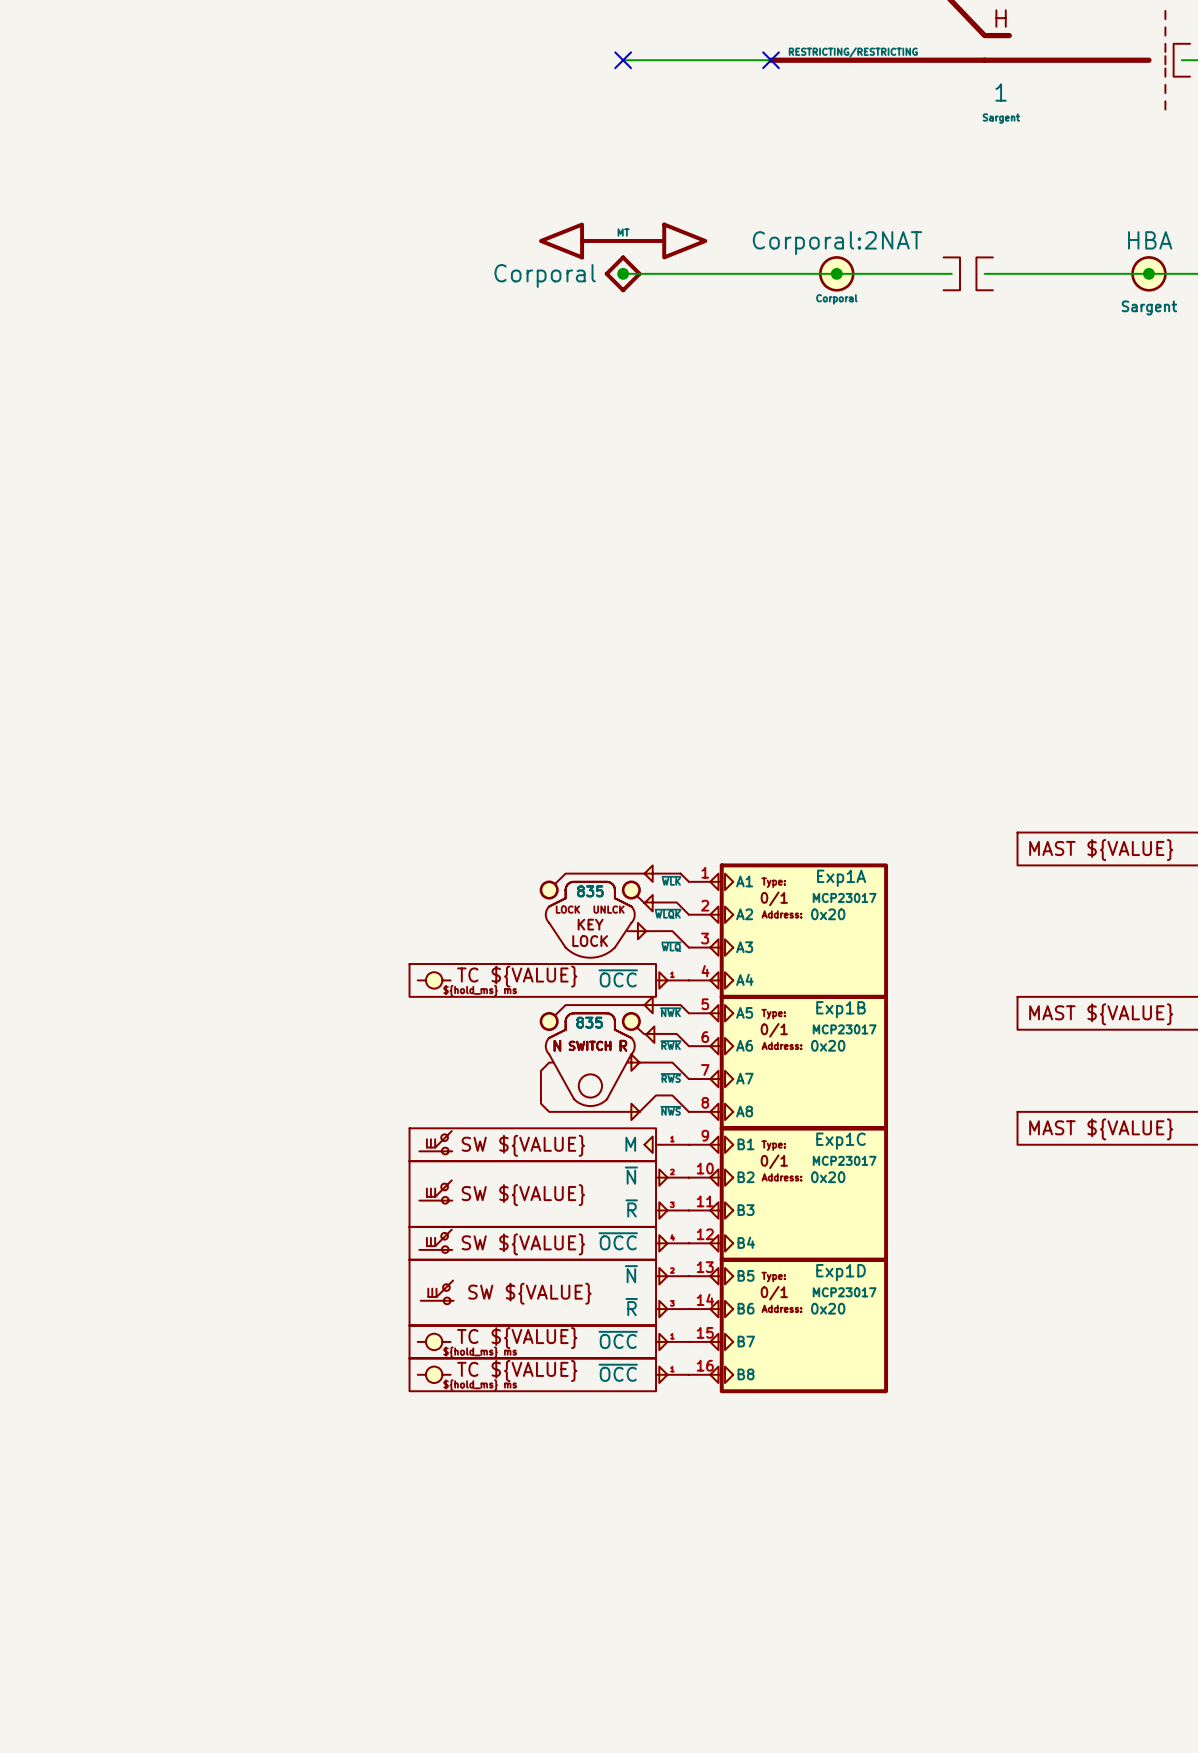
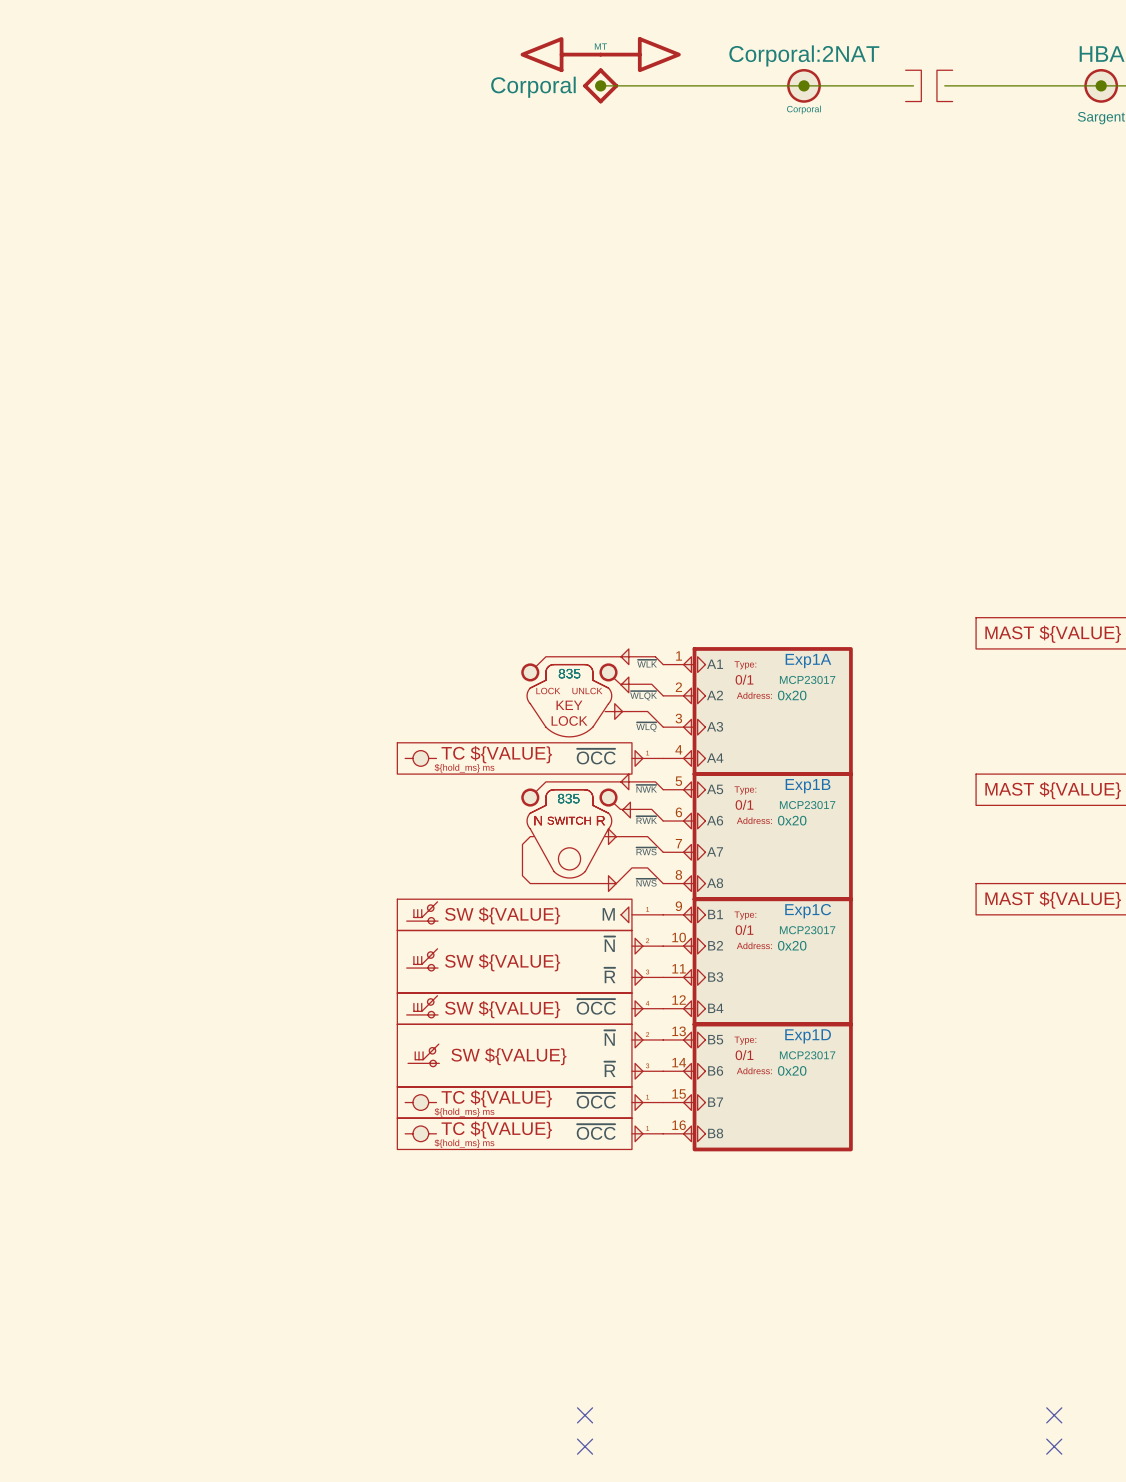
no-connect mark: none -> (585, 1415)
no-connect mark: none -> (1054, 1415)
no-connect mark: none -> (585, 1446)
no-connect mark: none -> (1054, 1446)

